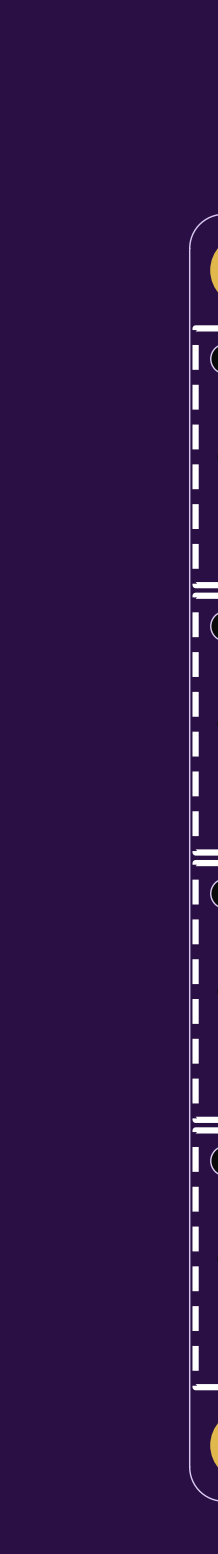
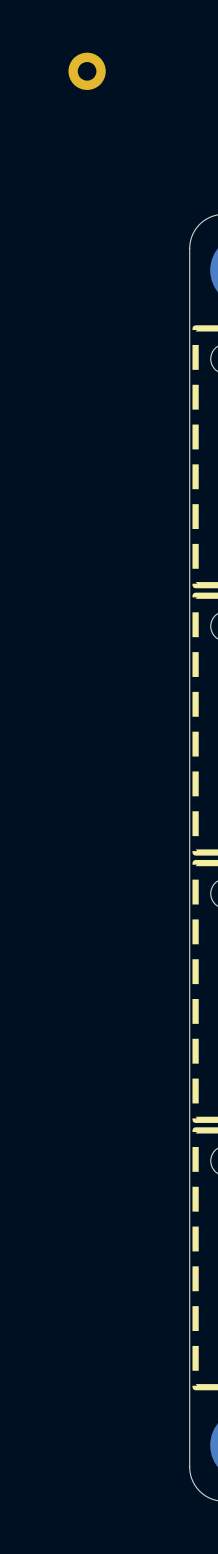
part: none -> (87, 71)

